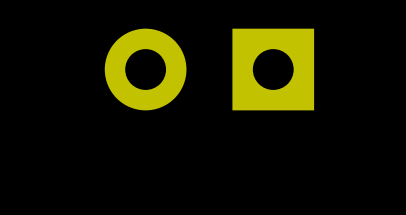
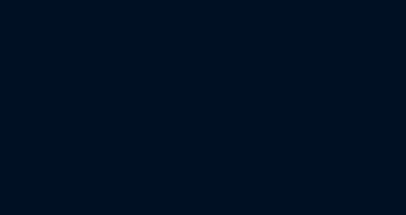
part: (209, 69) -> none

